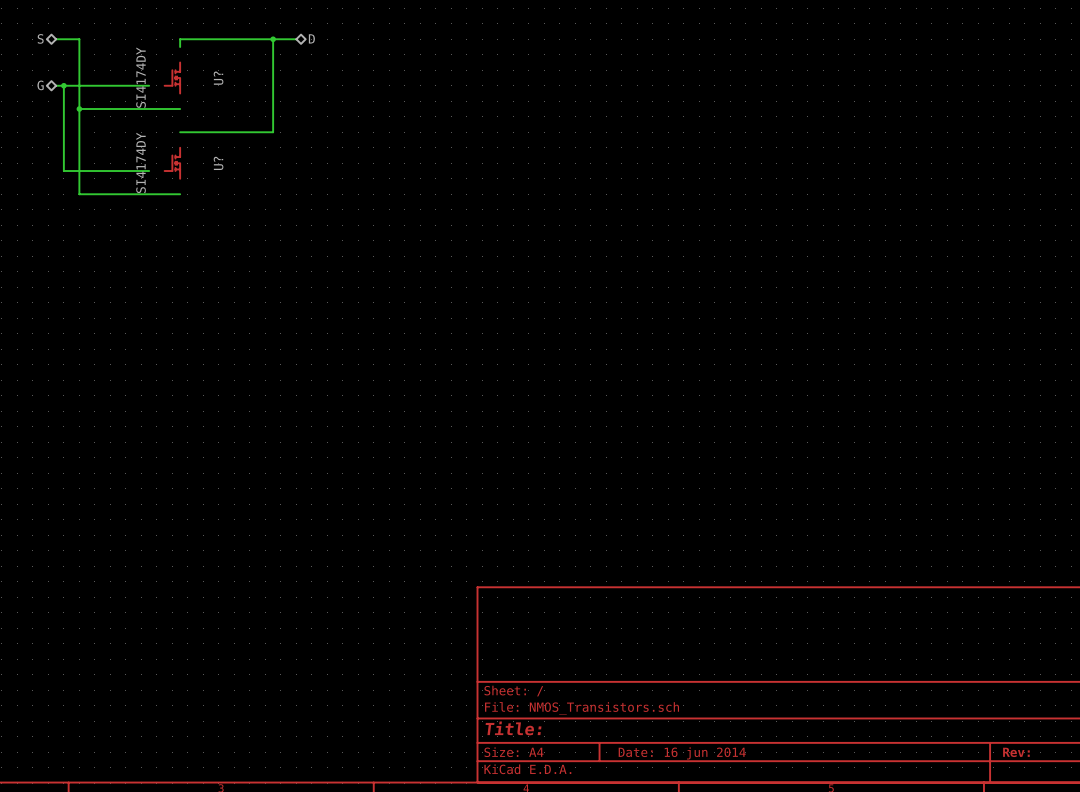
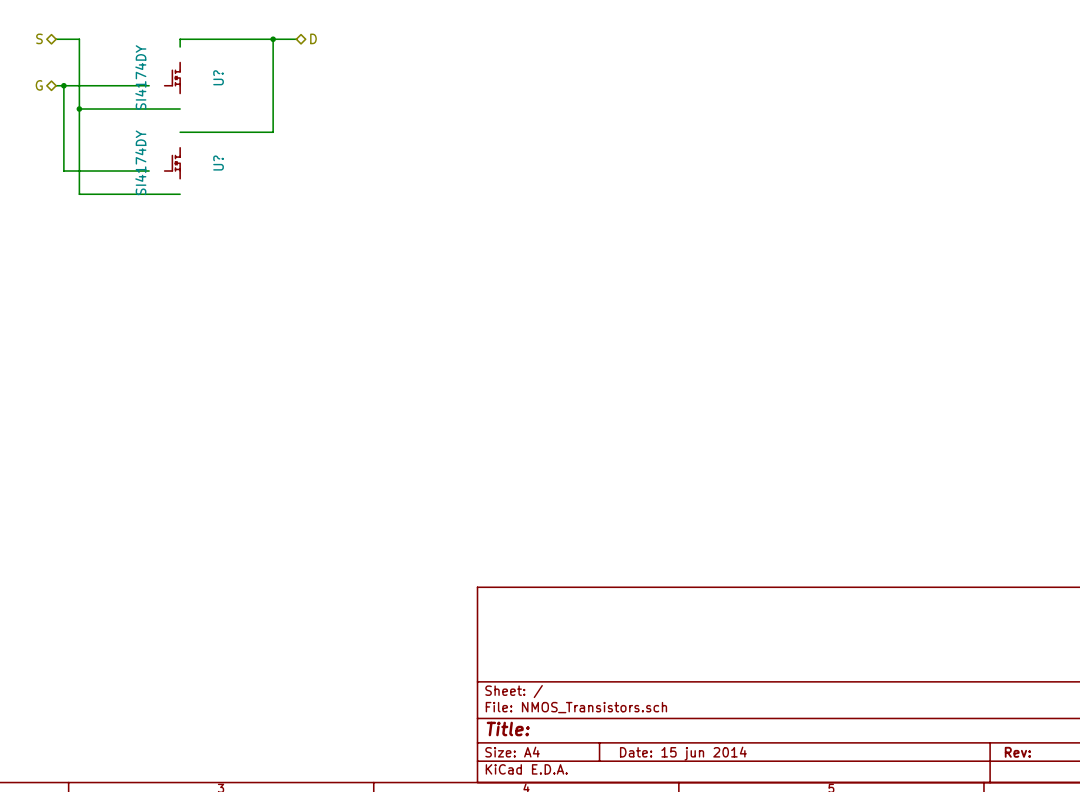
title block: Date: 16 jun 2014 (682, 753) -> Date: 15 jun 2014 (683, 753)

